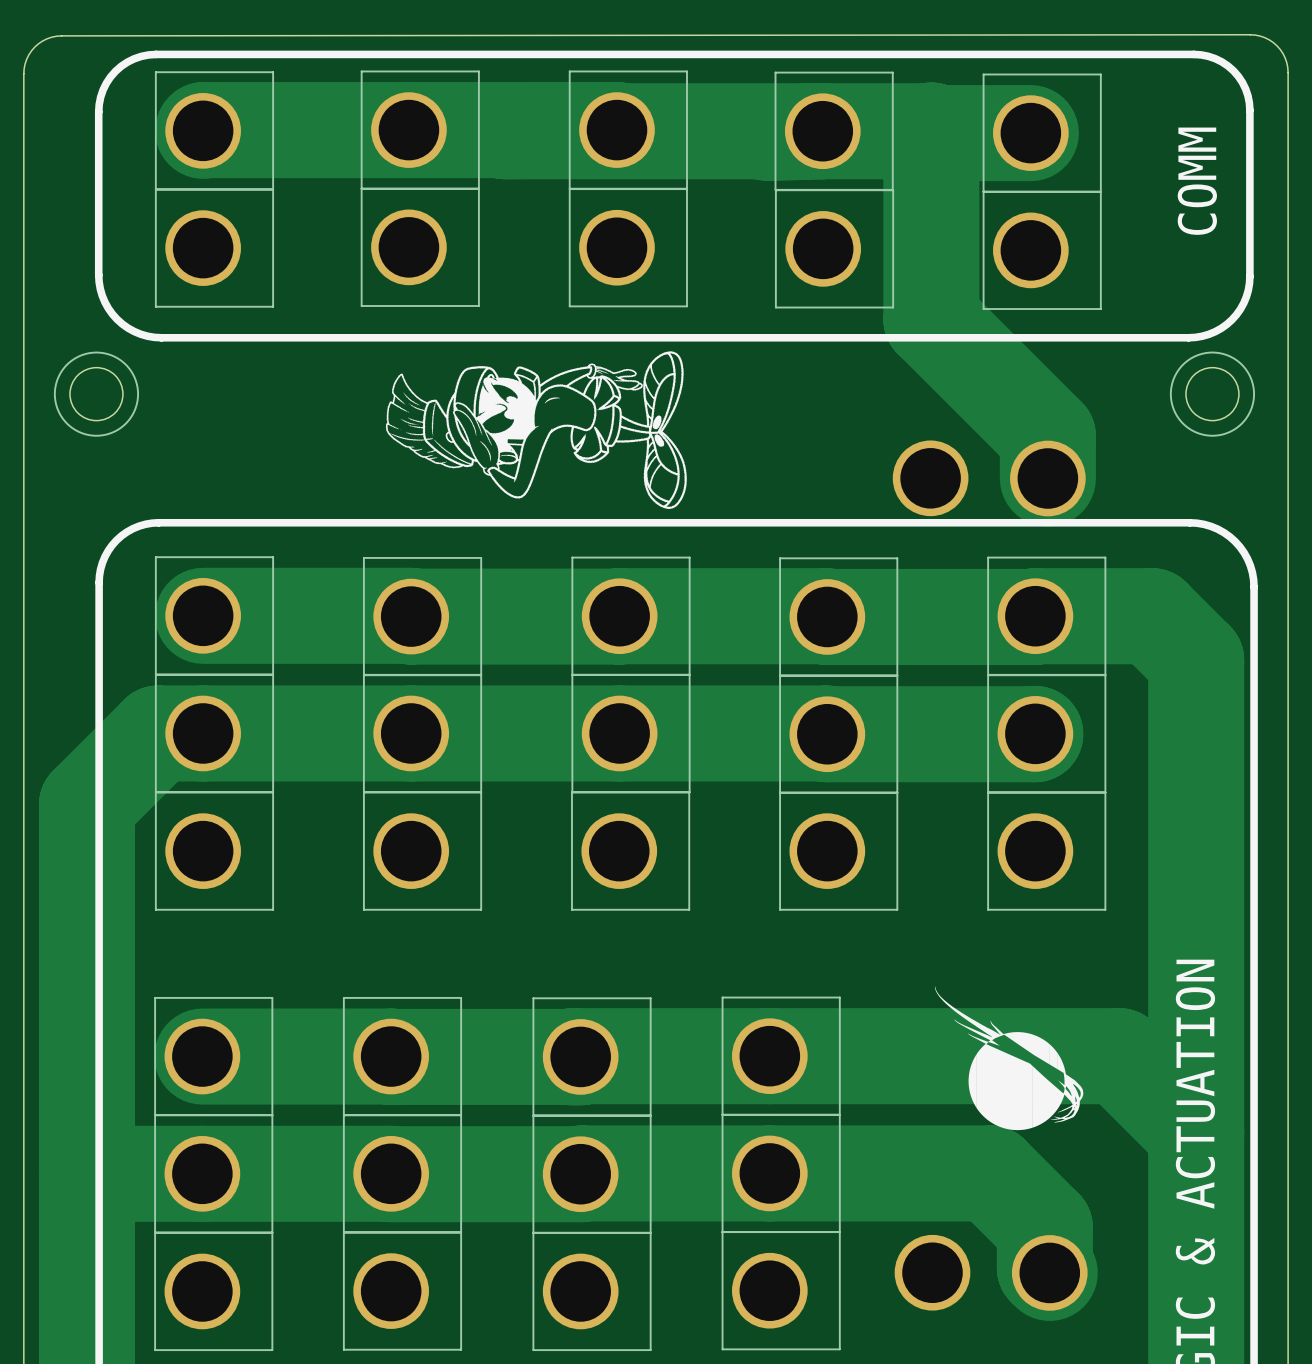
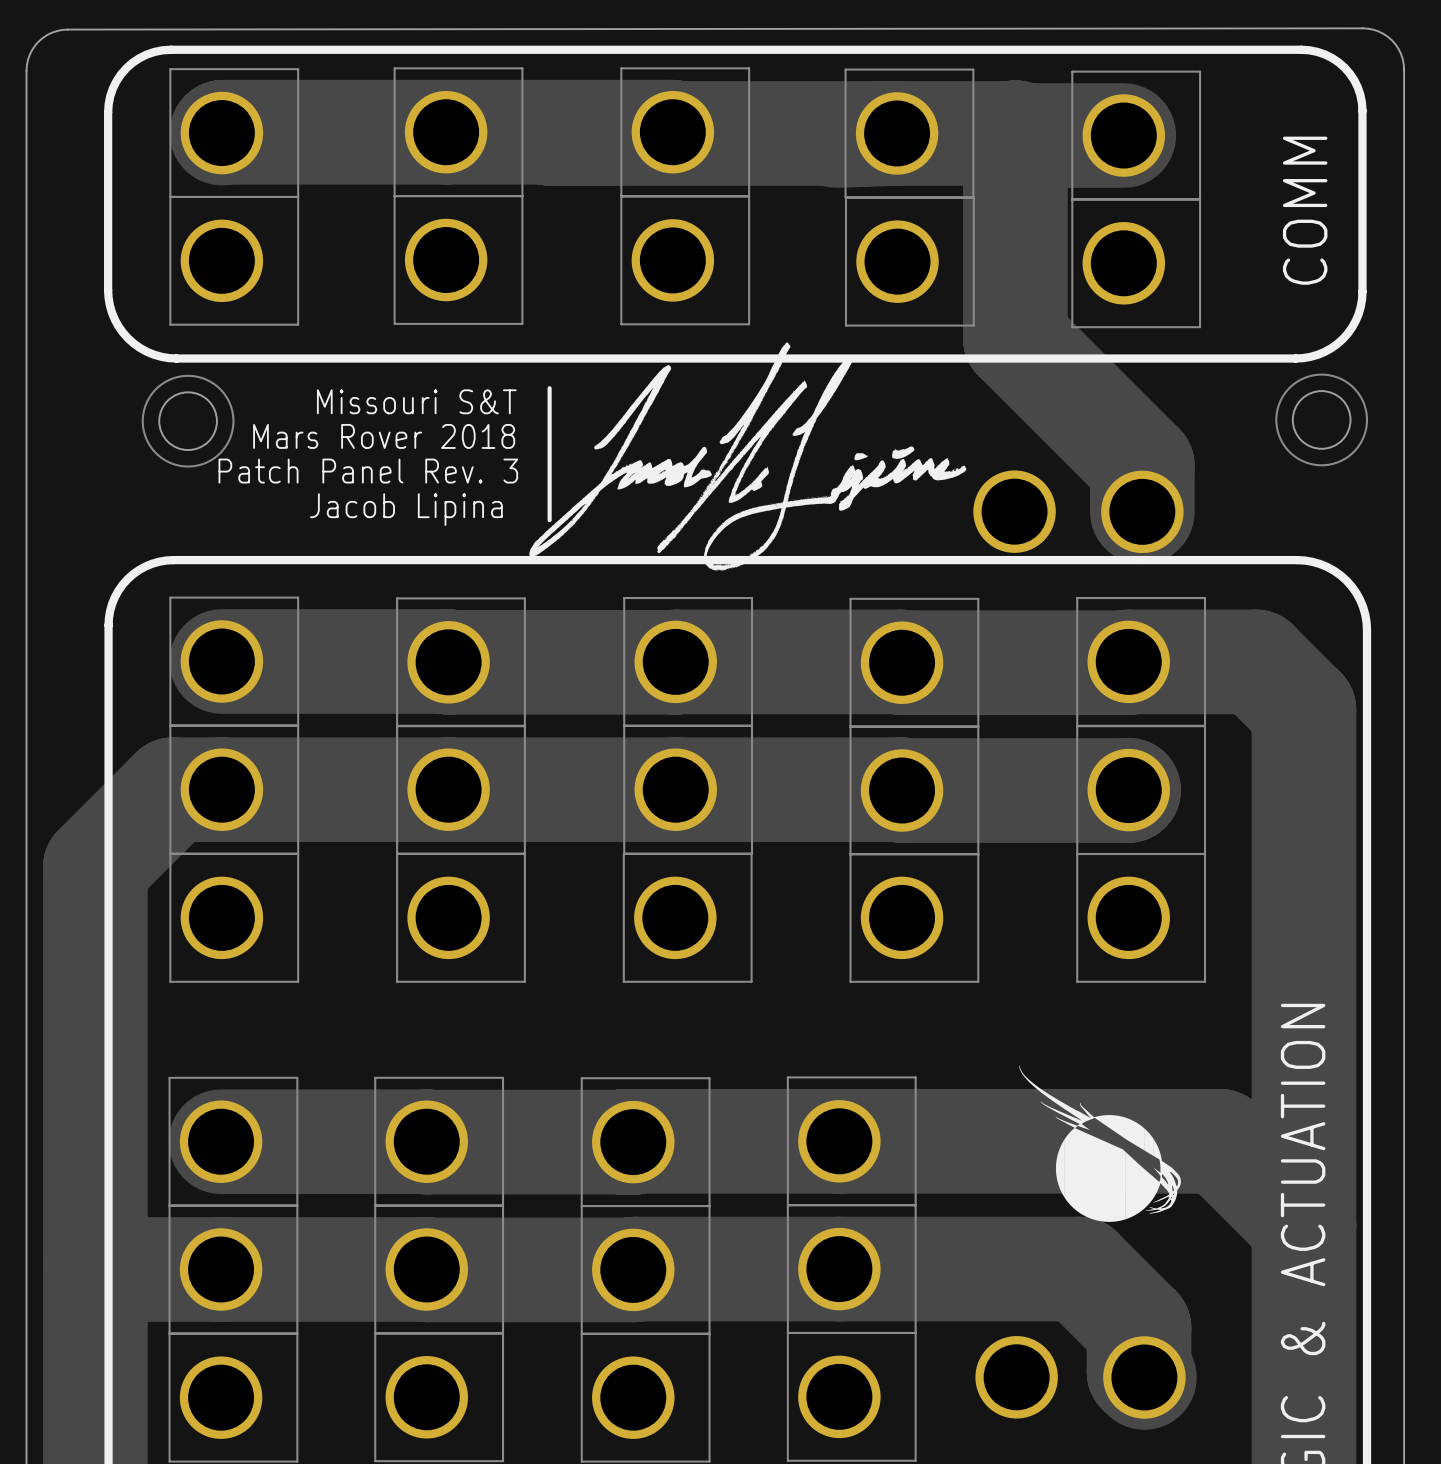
drawing: none -> [529, 342, 967, 571]
drawing: [385, 351, 687, 509] -> none
line: none -> (549, 388) (549, 520)
text: none -> Missouri S&T (416, 401)
drawing position: (96, 394) -> (188, 421)
text: none -> Mars Rover 2018 (384, 436)
text: none -> Patch Panel Rev. 3 (368, 471)
text: none -> Jacob Lipina (406, 509)

